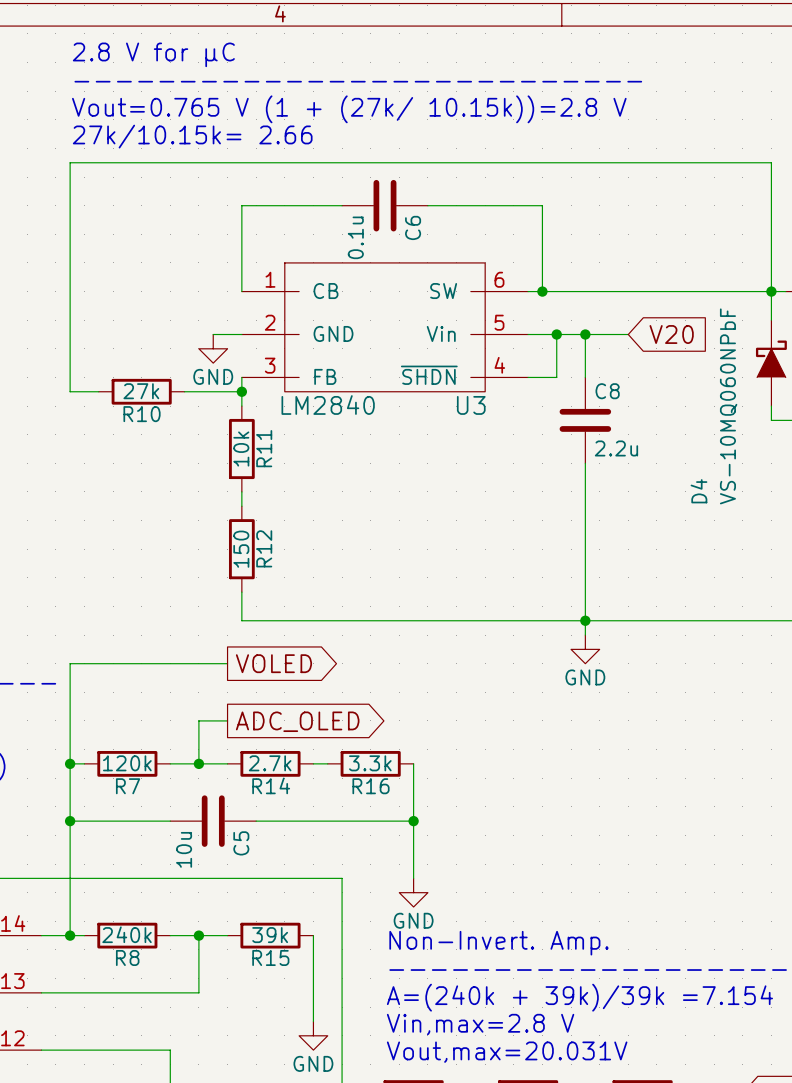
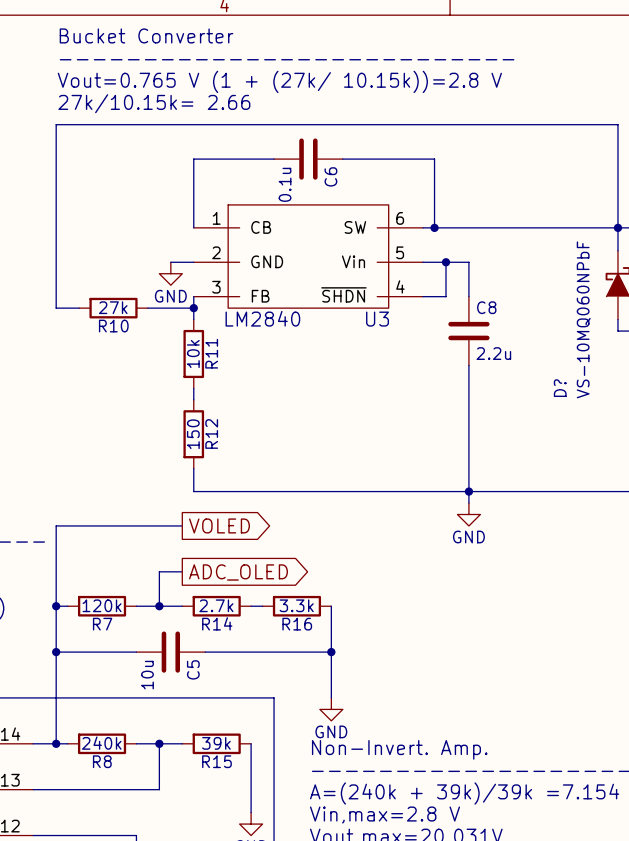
text: 2.8 V for µC (153, 54) -> Bucket Converter (146, 35)
wire: (585, 334) (628, 334) -> none
junction: (585, 334) -> none
global label: V20 (671, 334) -> none
D4 name: D4 (698, 491) -> D? (560, 388)

